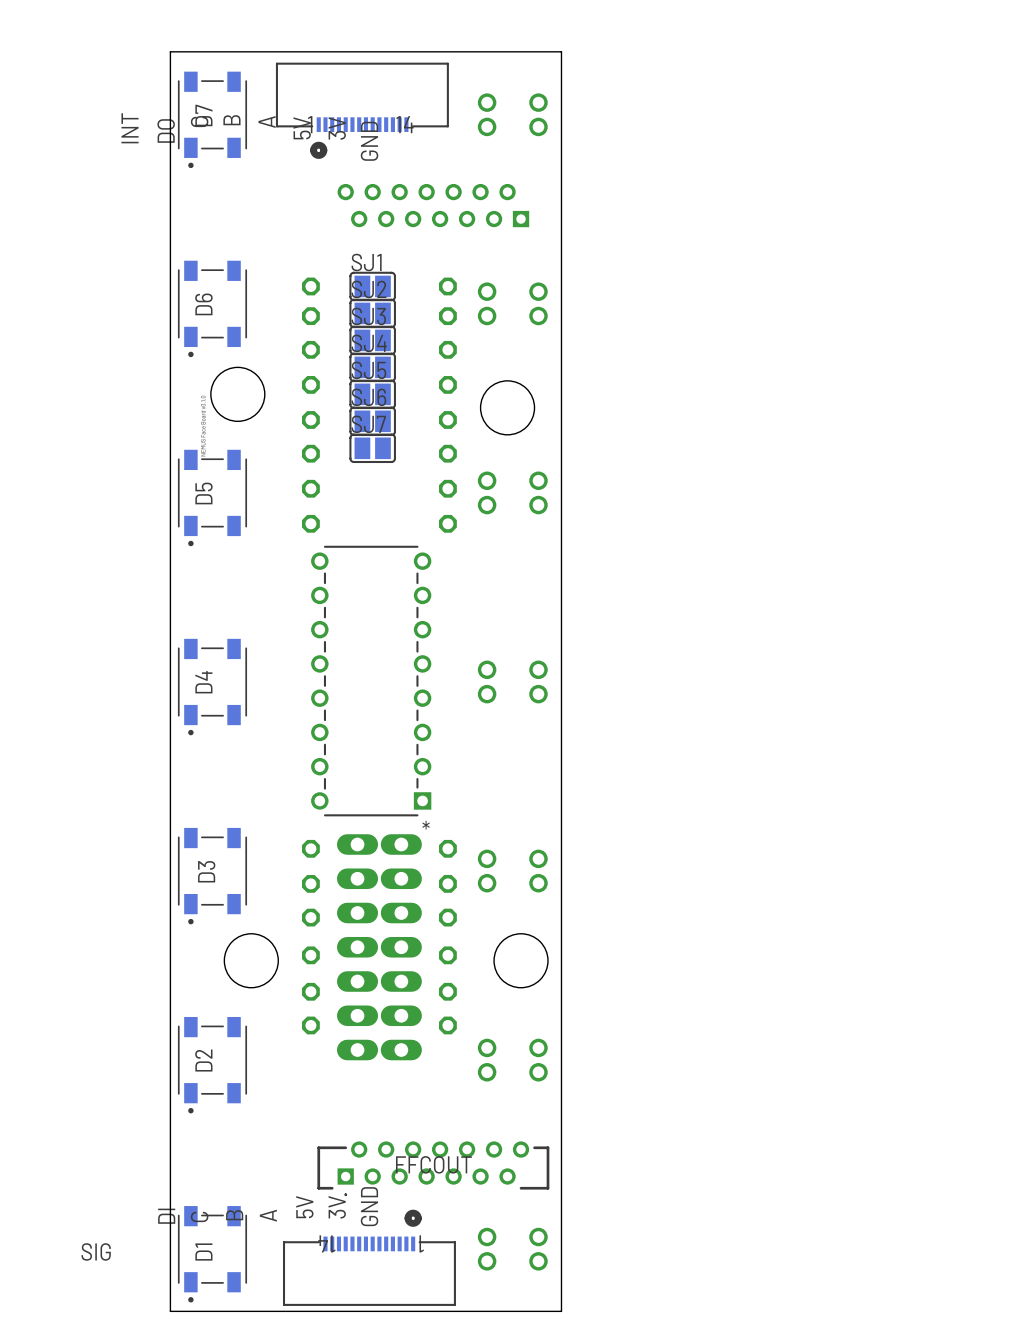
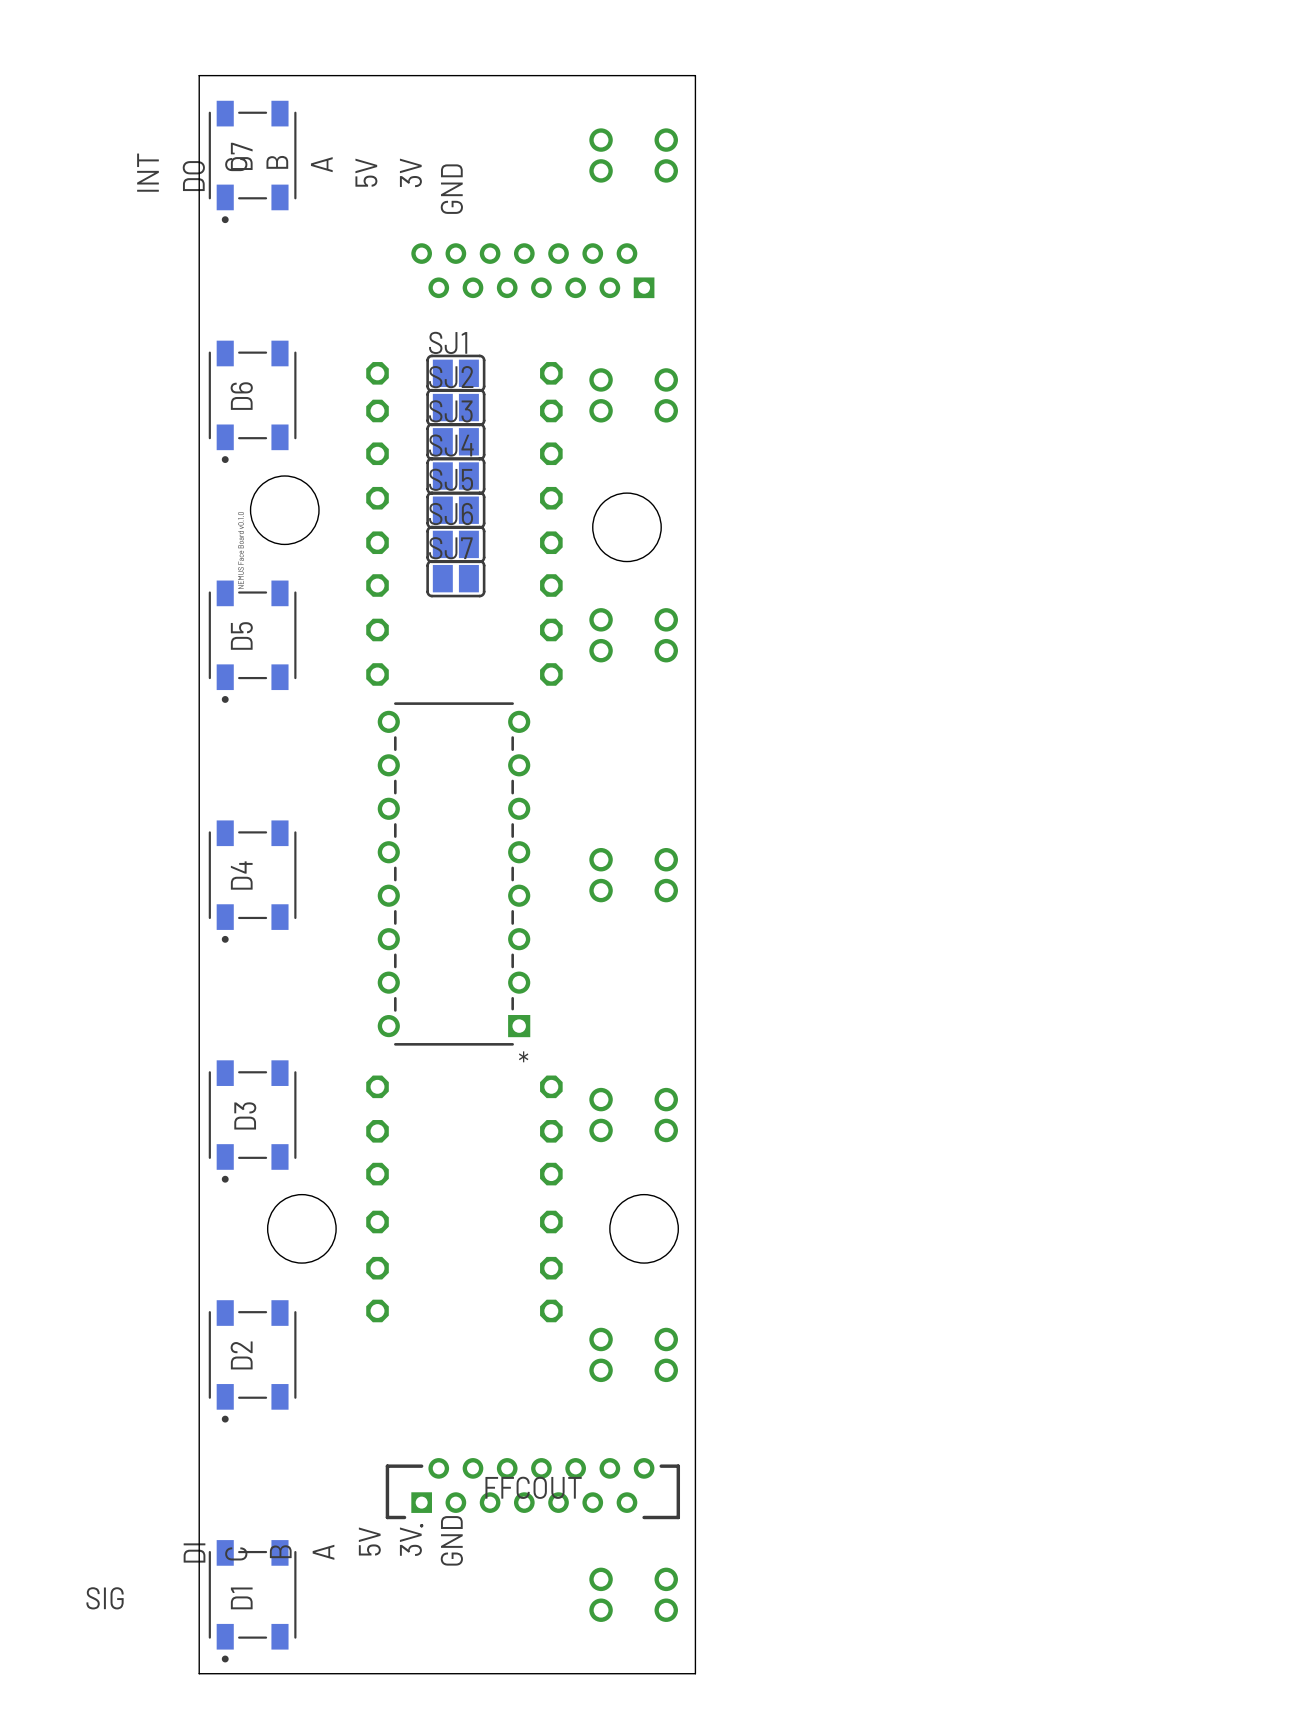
part: (362, 110) -> none
part: (357, 947) -> none
part: (401, 947) -> none
part: (369, 1257) -> none

